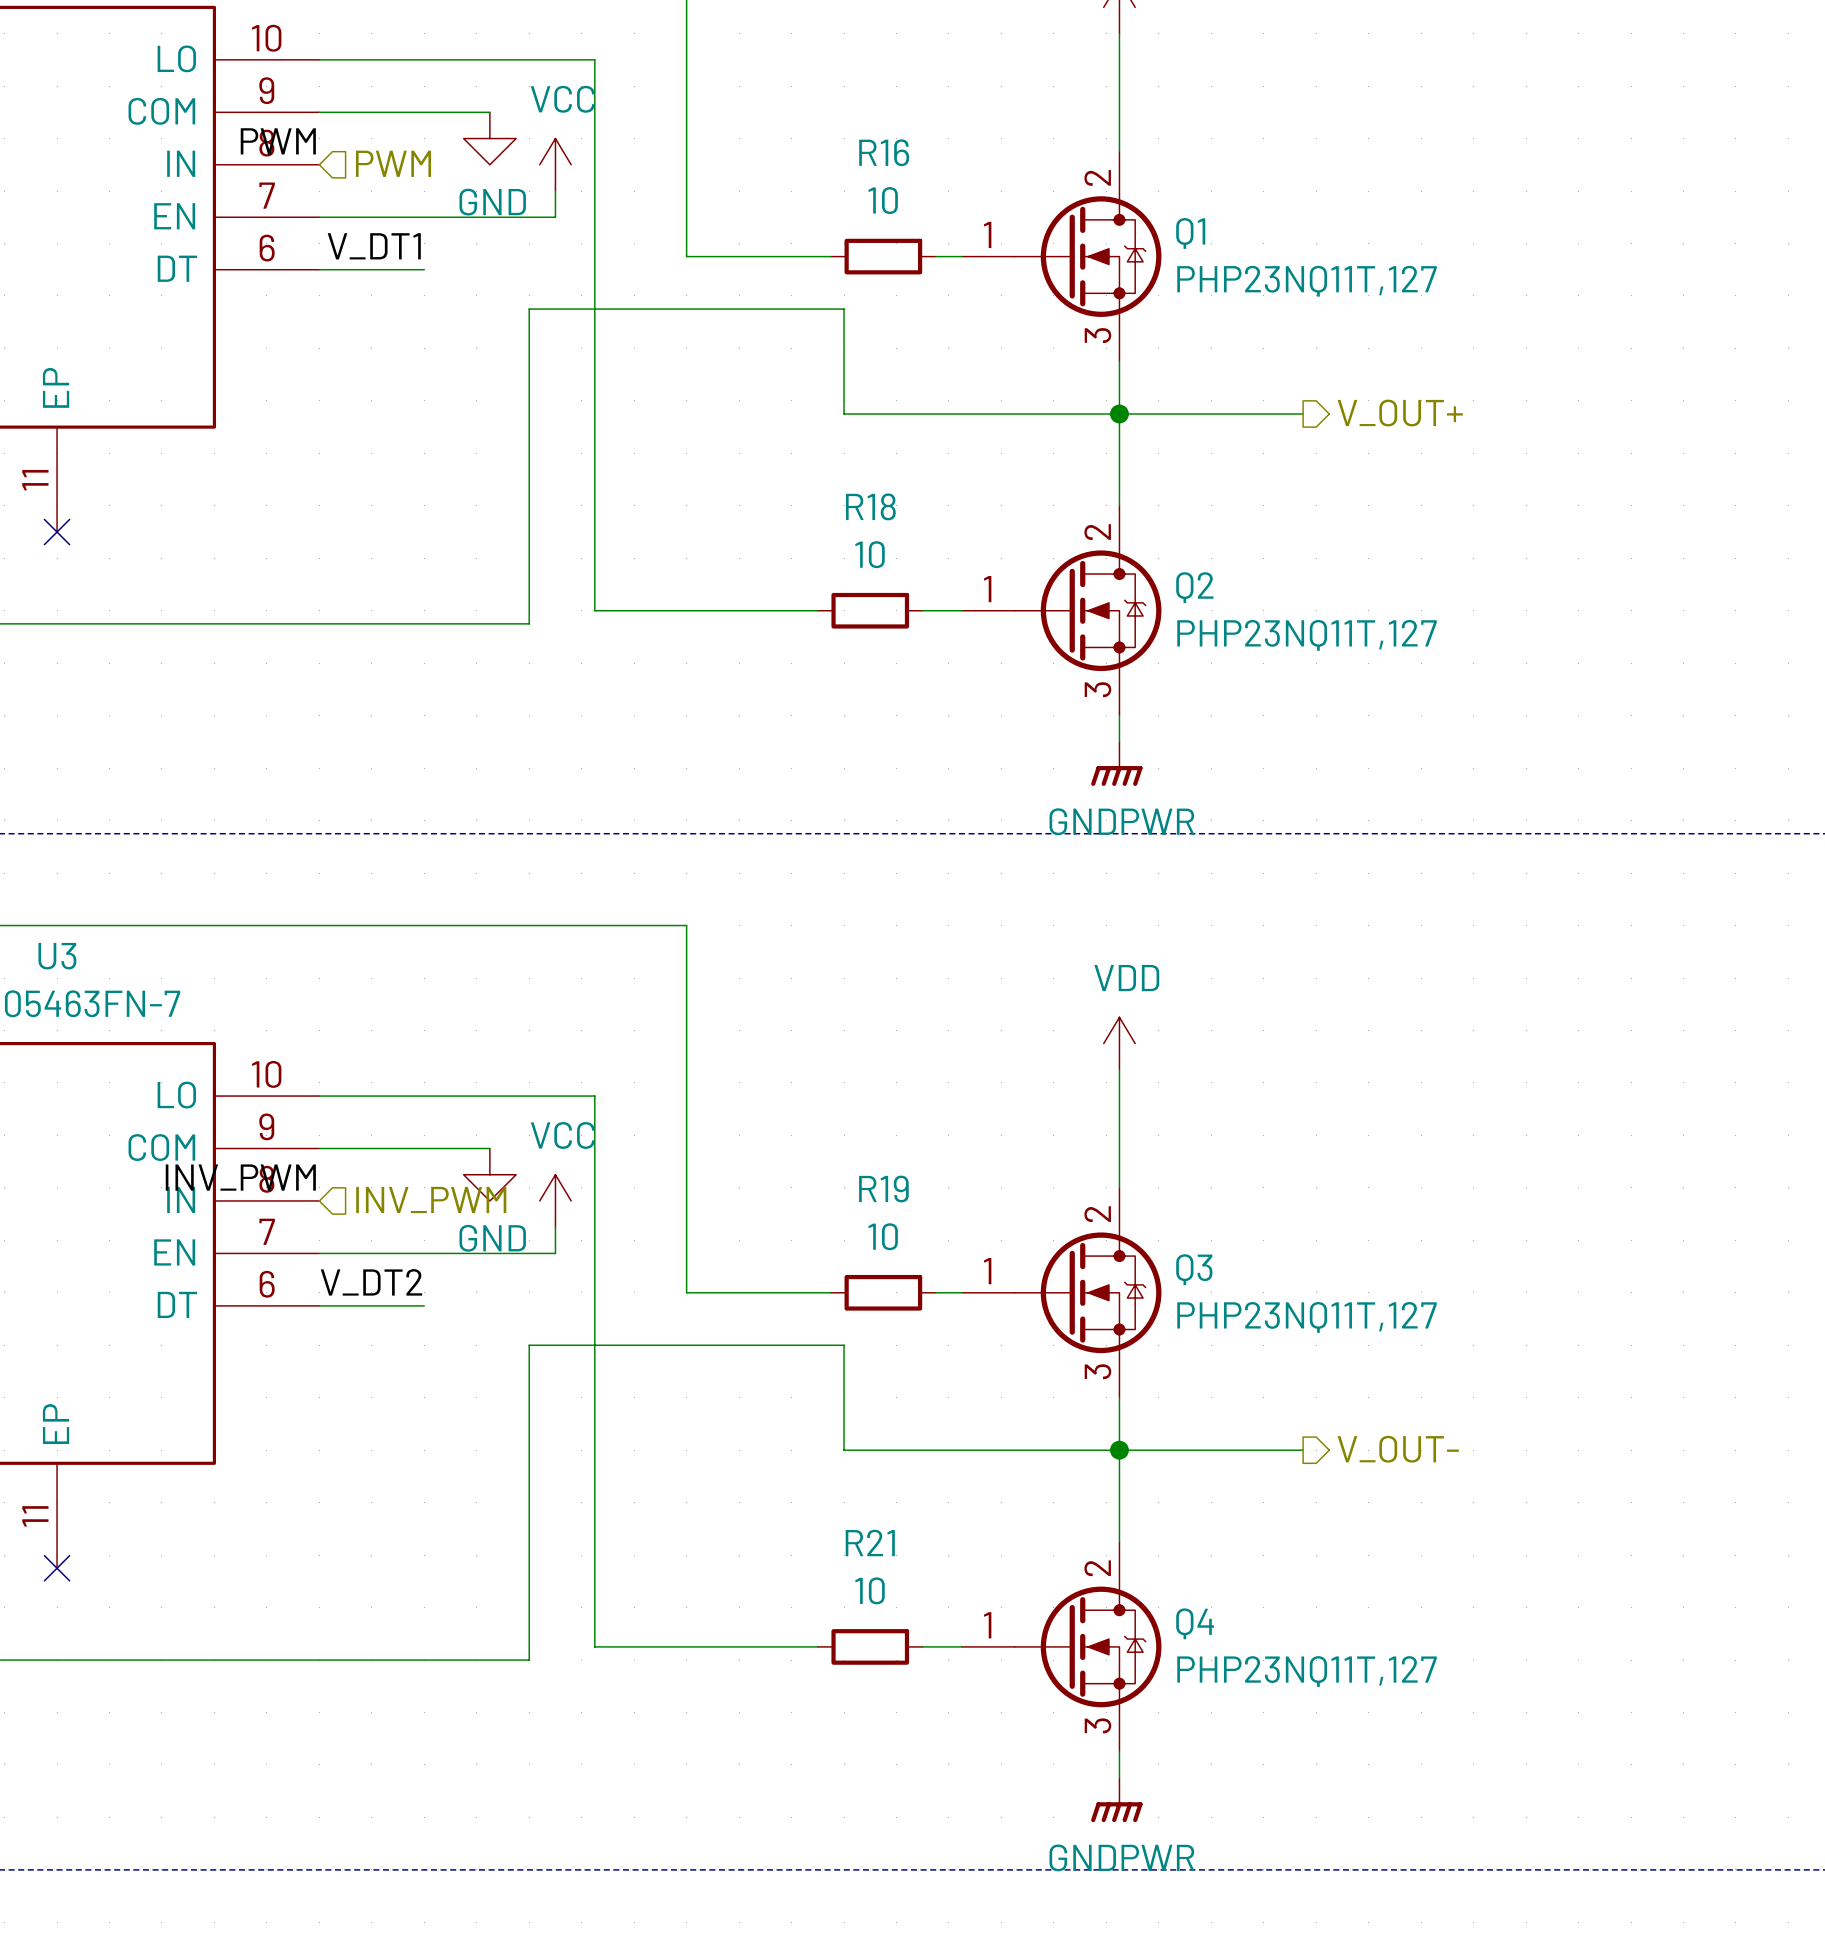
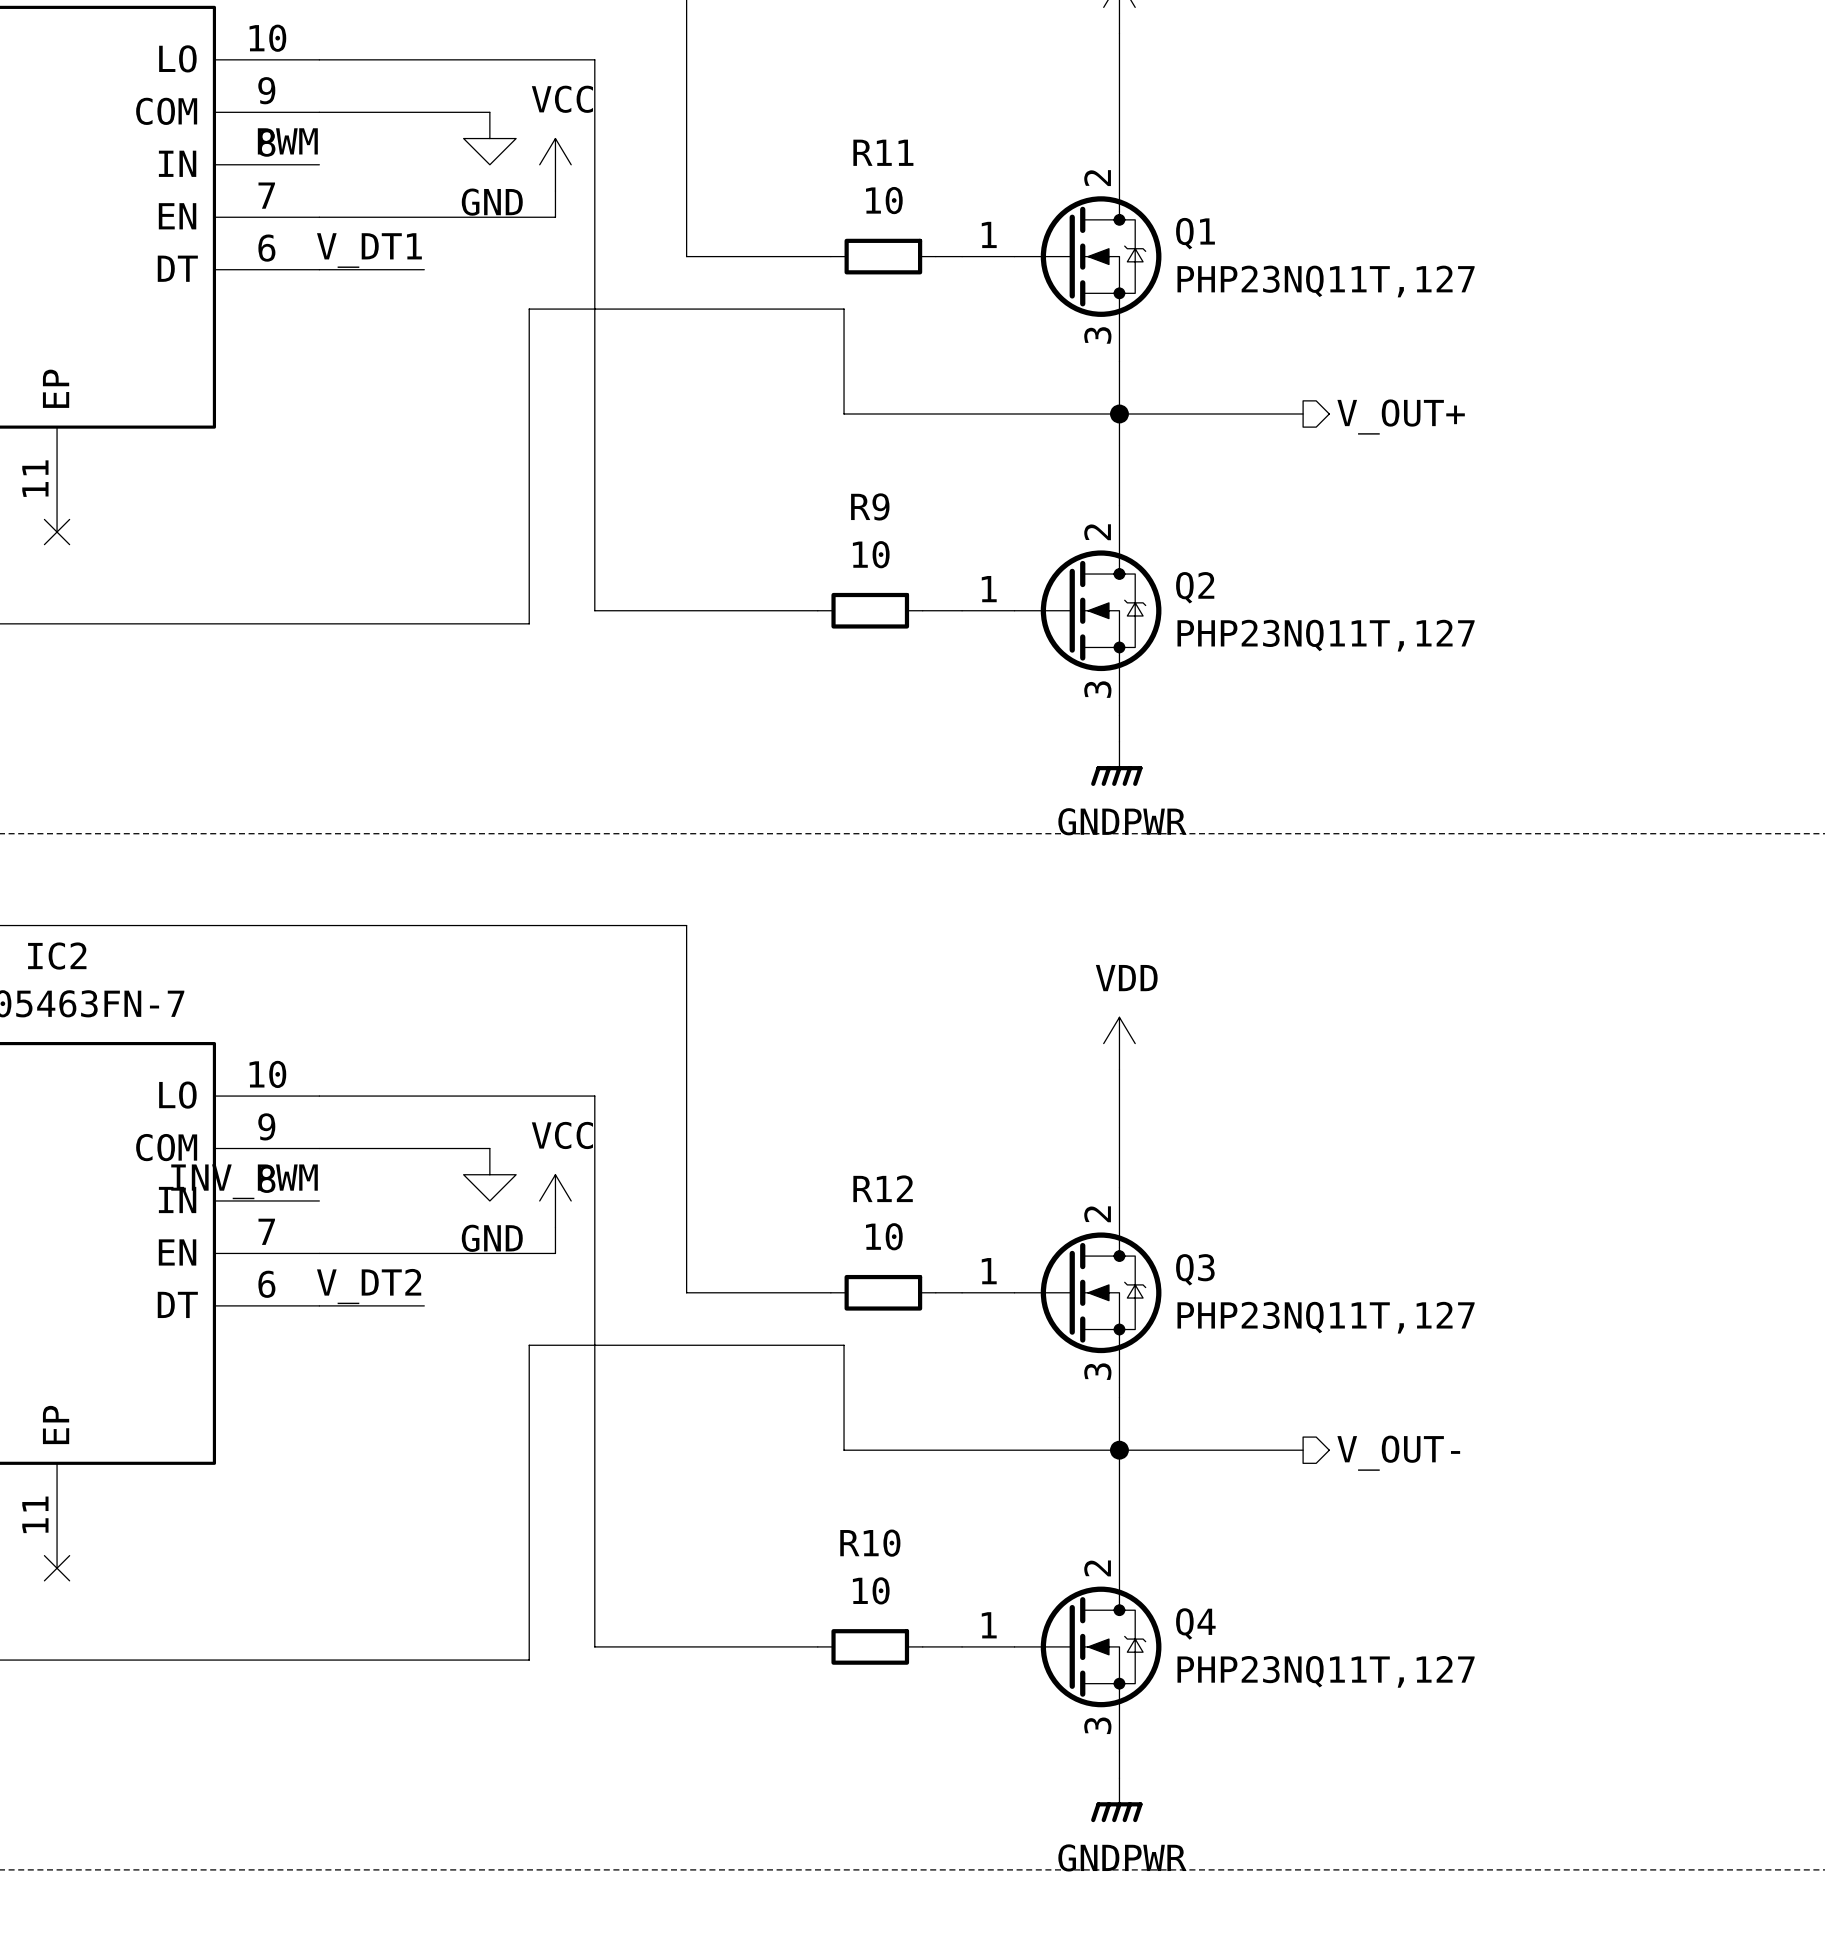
R16 name: R16 (884, 152) -> R11 (883, 152)
hierarchical label: PWM (393, 163) -> none
R18 name: R18 (870, 506) -> R9 (870, 506)
U3 name: U3 (57, 956) -> IC2 (57, 956)
R19 name: R19 (883, 1188) -> R12 (883, 1188)
hierarchical label: INV_PWM (431, 1199) -> none
R21 name: R21 (870, 1542) -> R10 (870, 1543)

